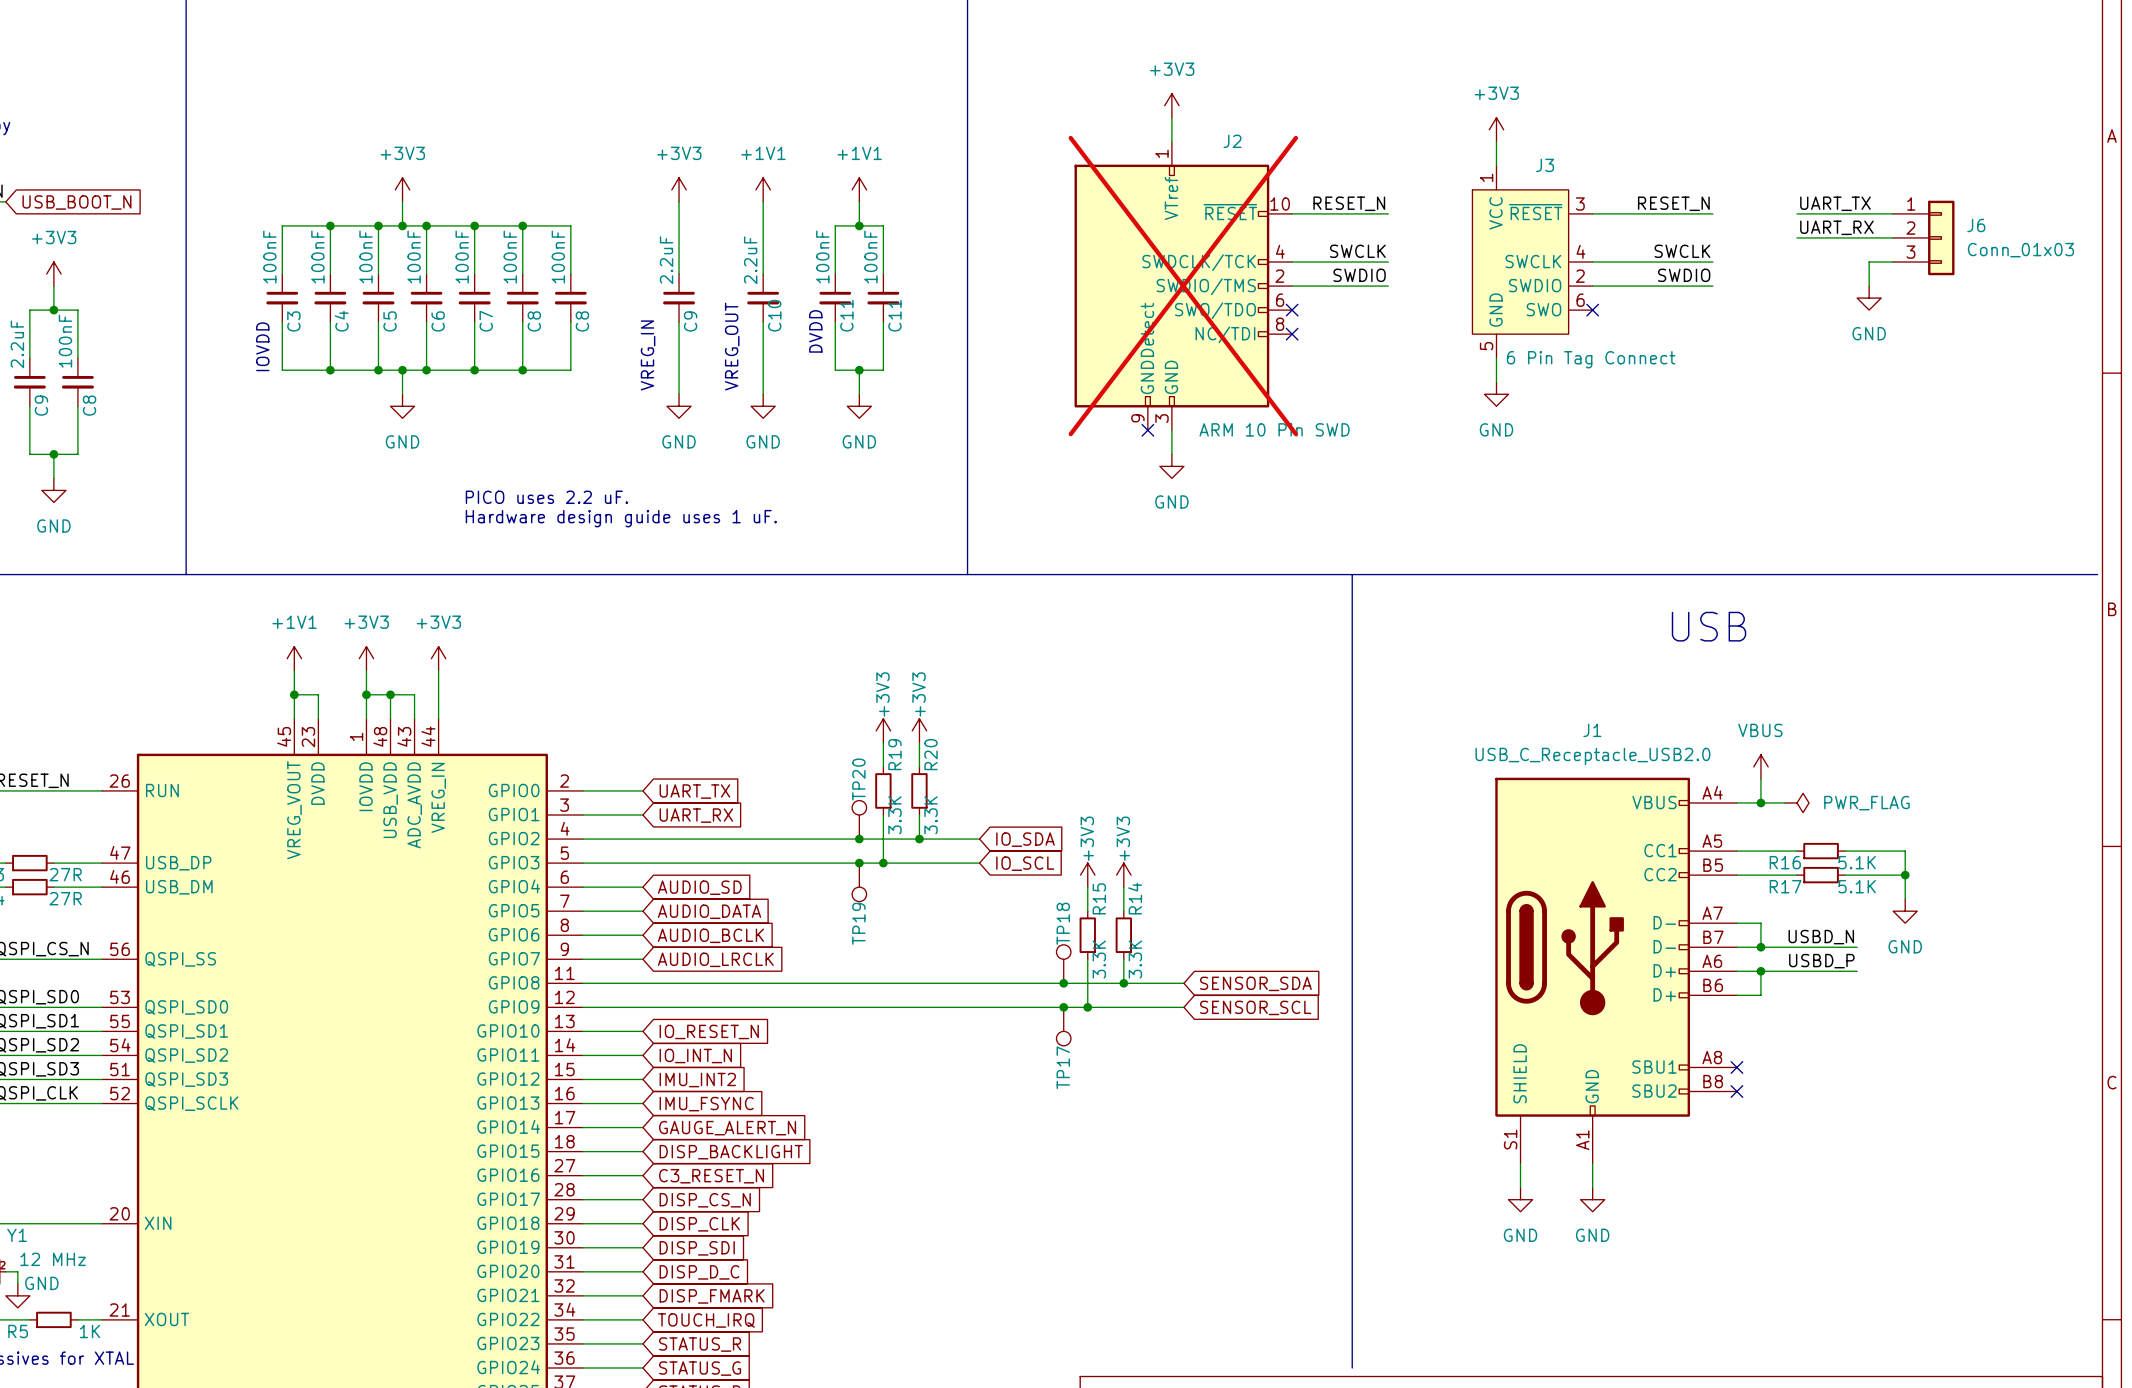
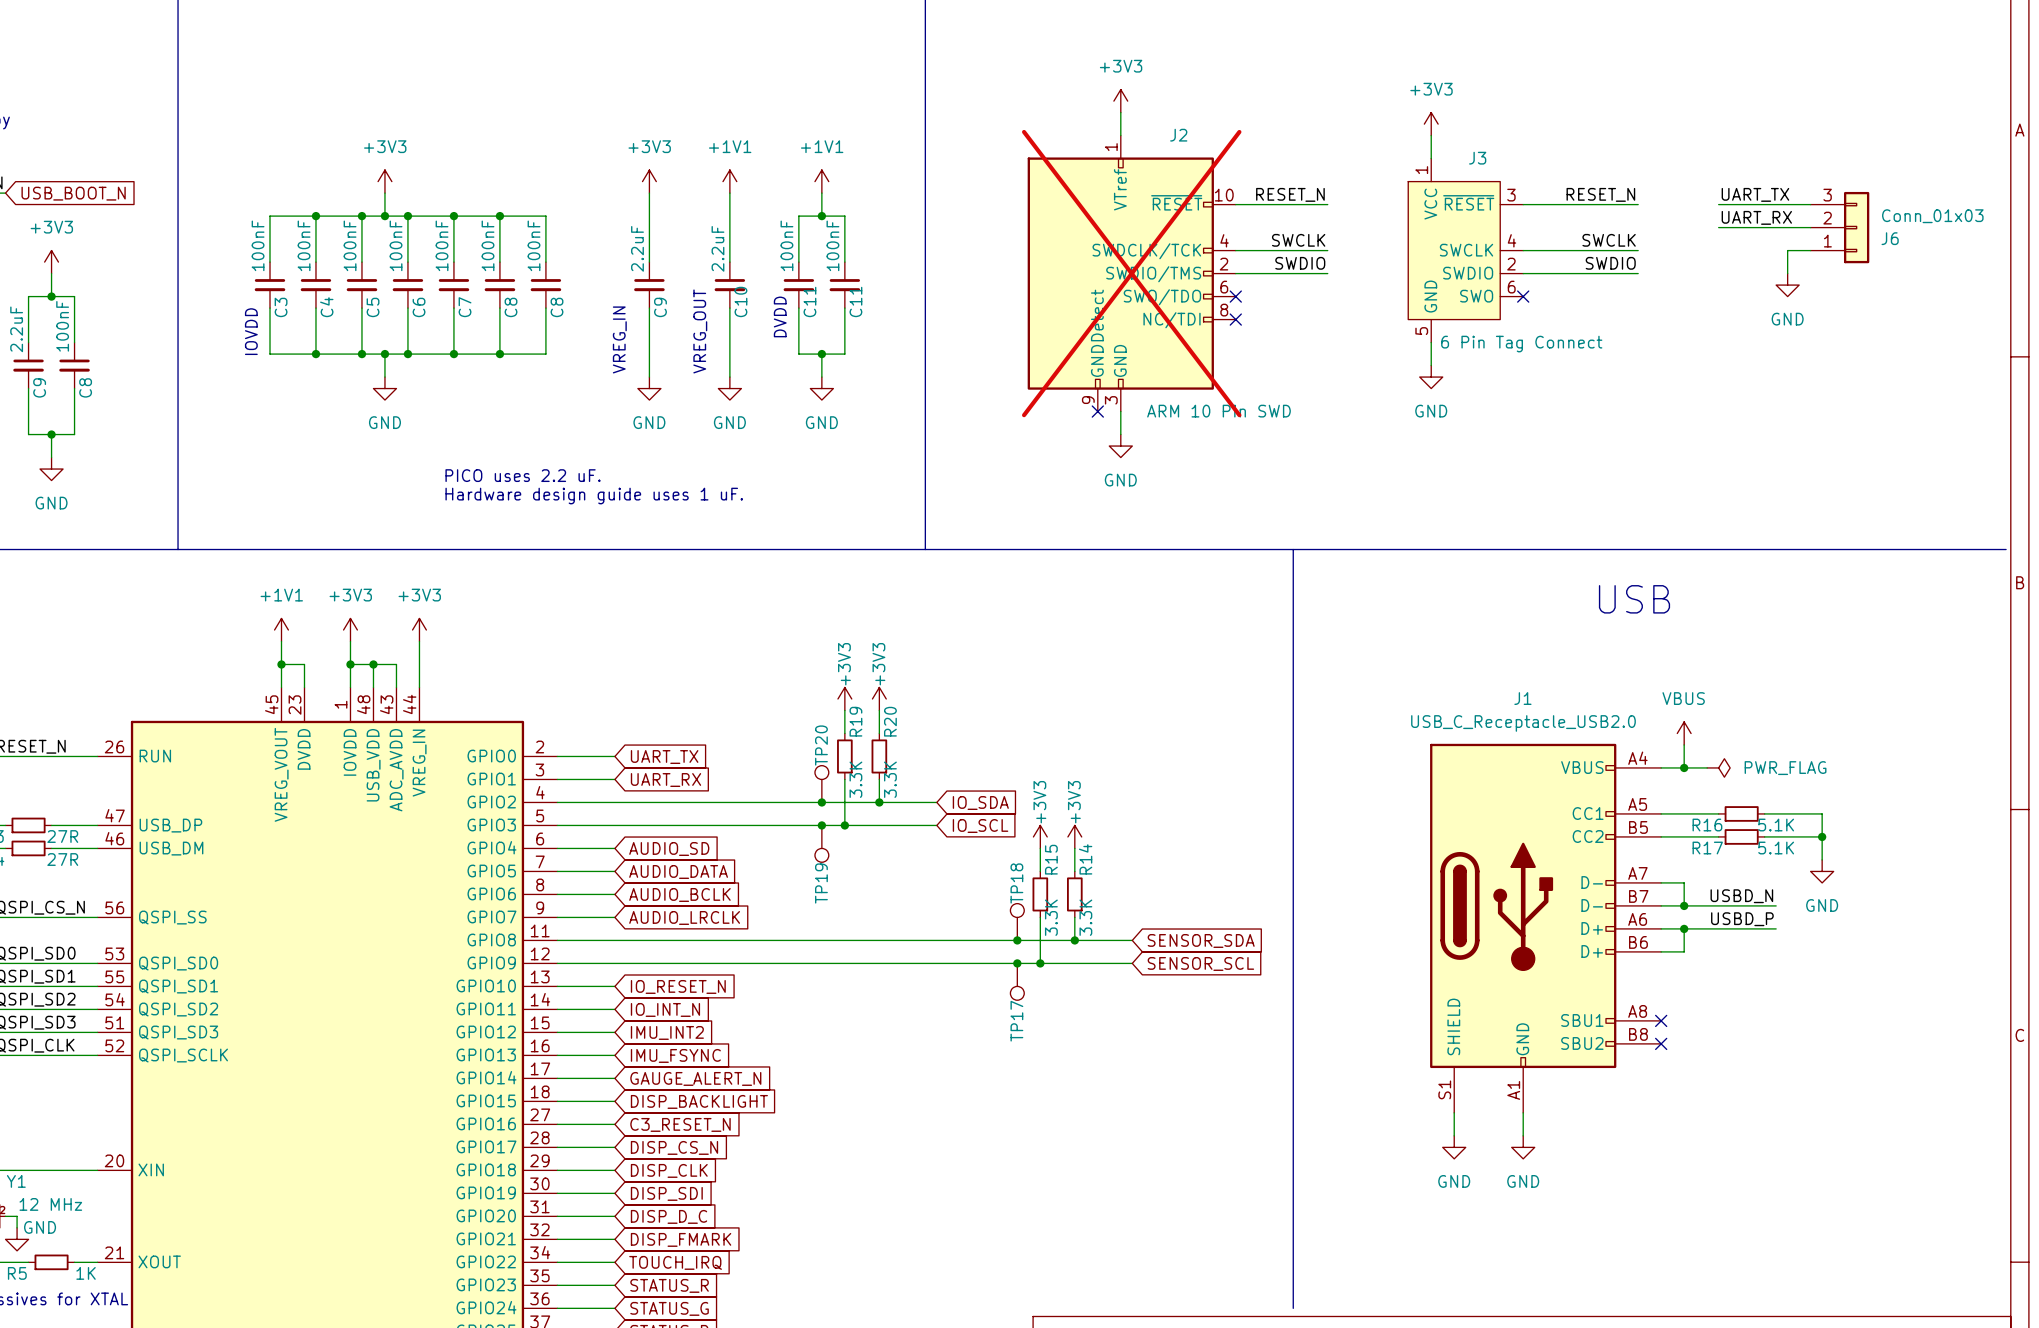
J6 flip: as is (1941, 237) -> up-down (1856, 227)

